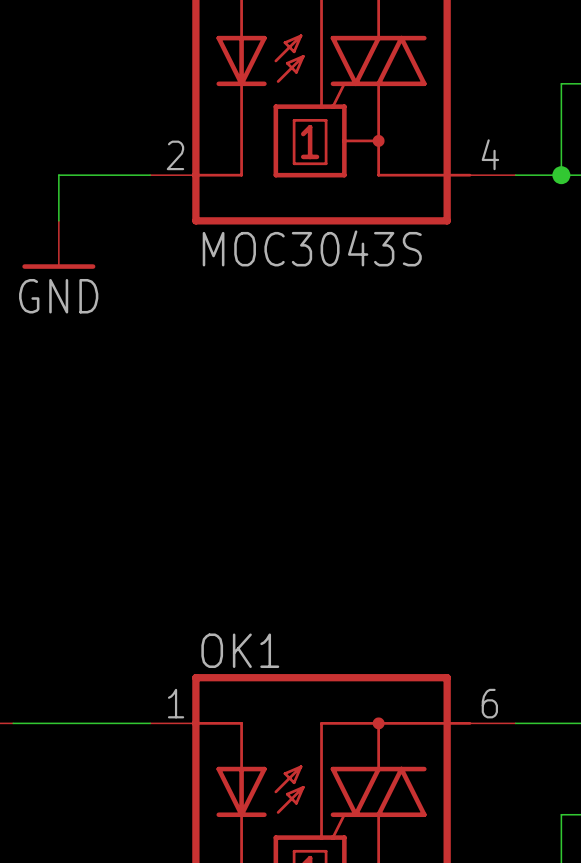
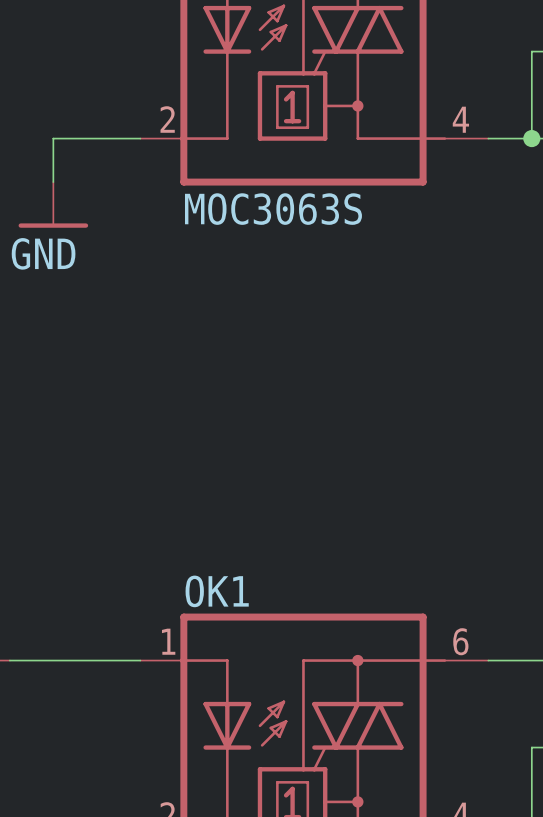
part value: MOC3043S (312, 248) -> MOC3063S (273, 209)

